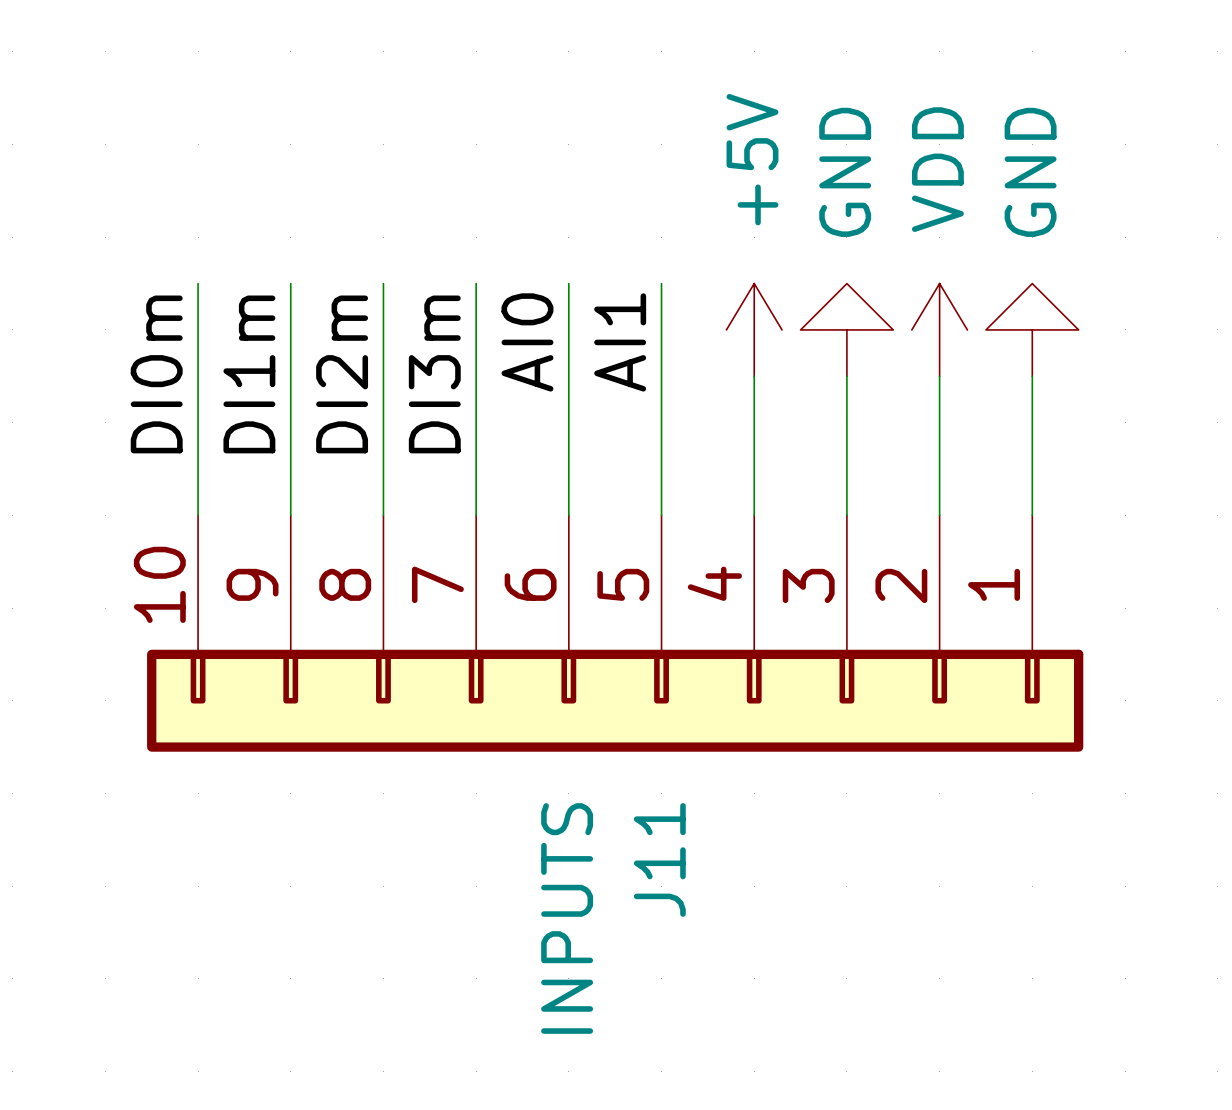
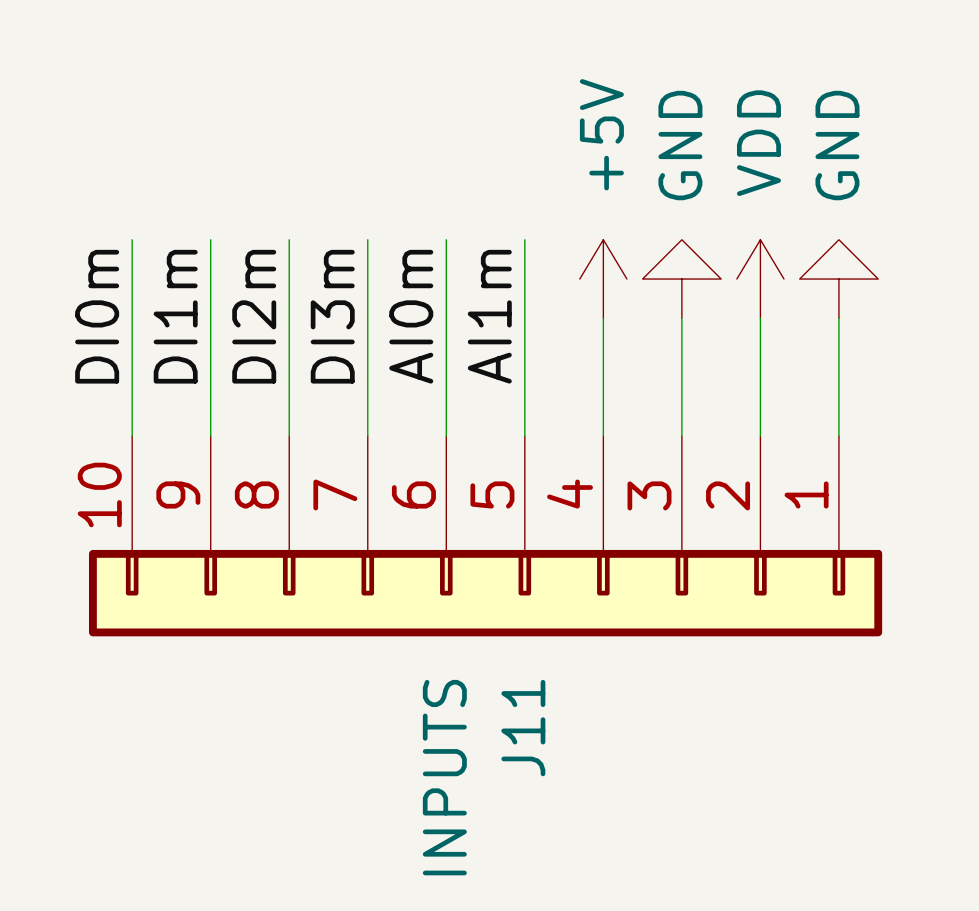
label: AI0 (527, 342) -> AI0m (411, 316)
label: AI1 (620, 342) -> AI1m (489, 316)

